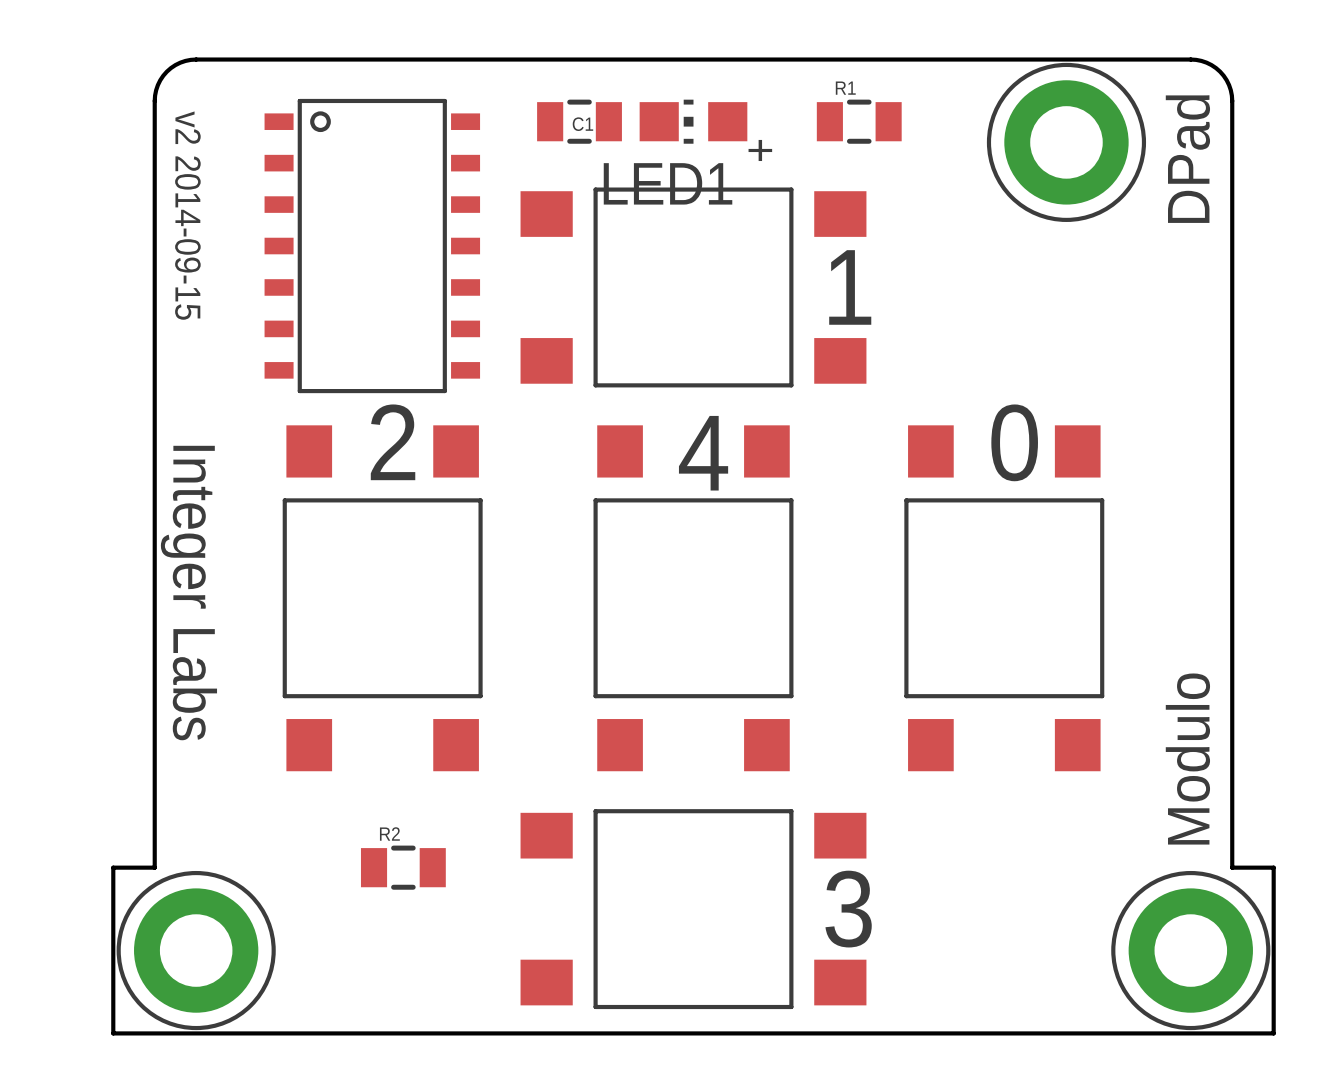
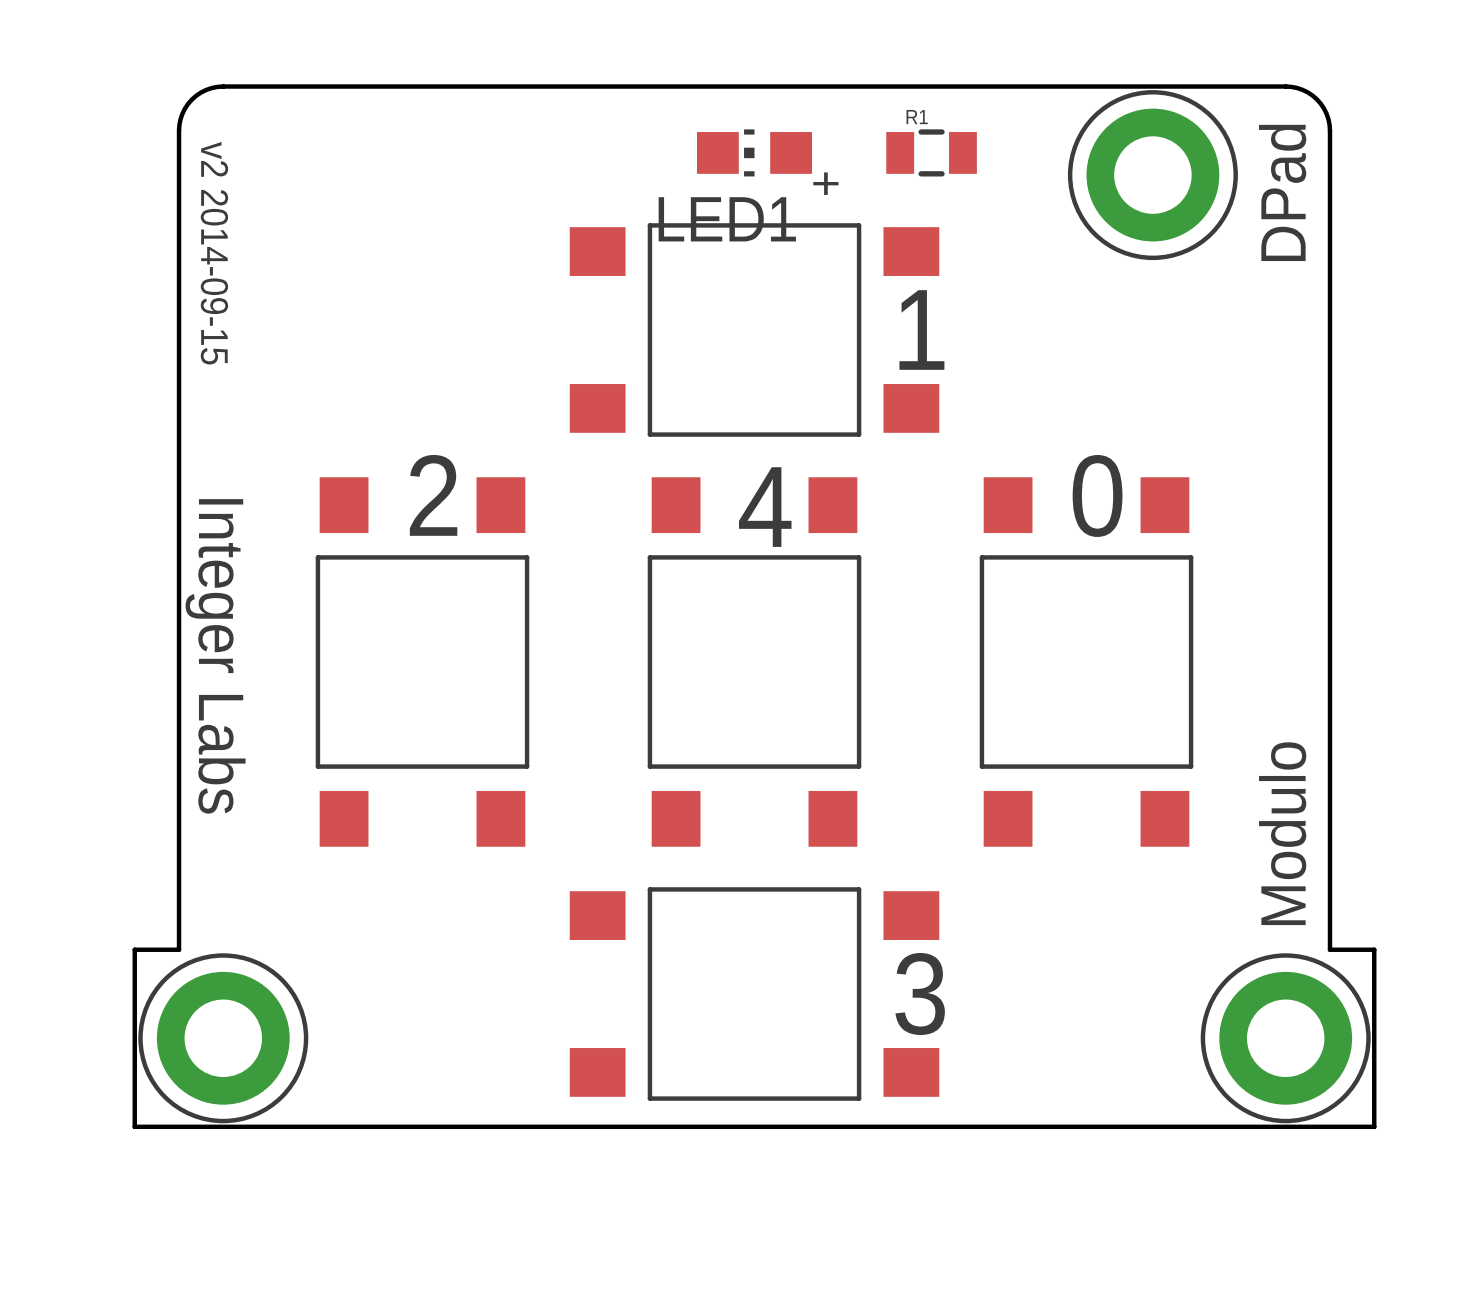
C1: (579, 121) -> none
part: (372, 246) -> none
R2: (403, 867) -> none

